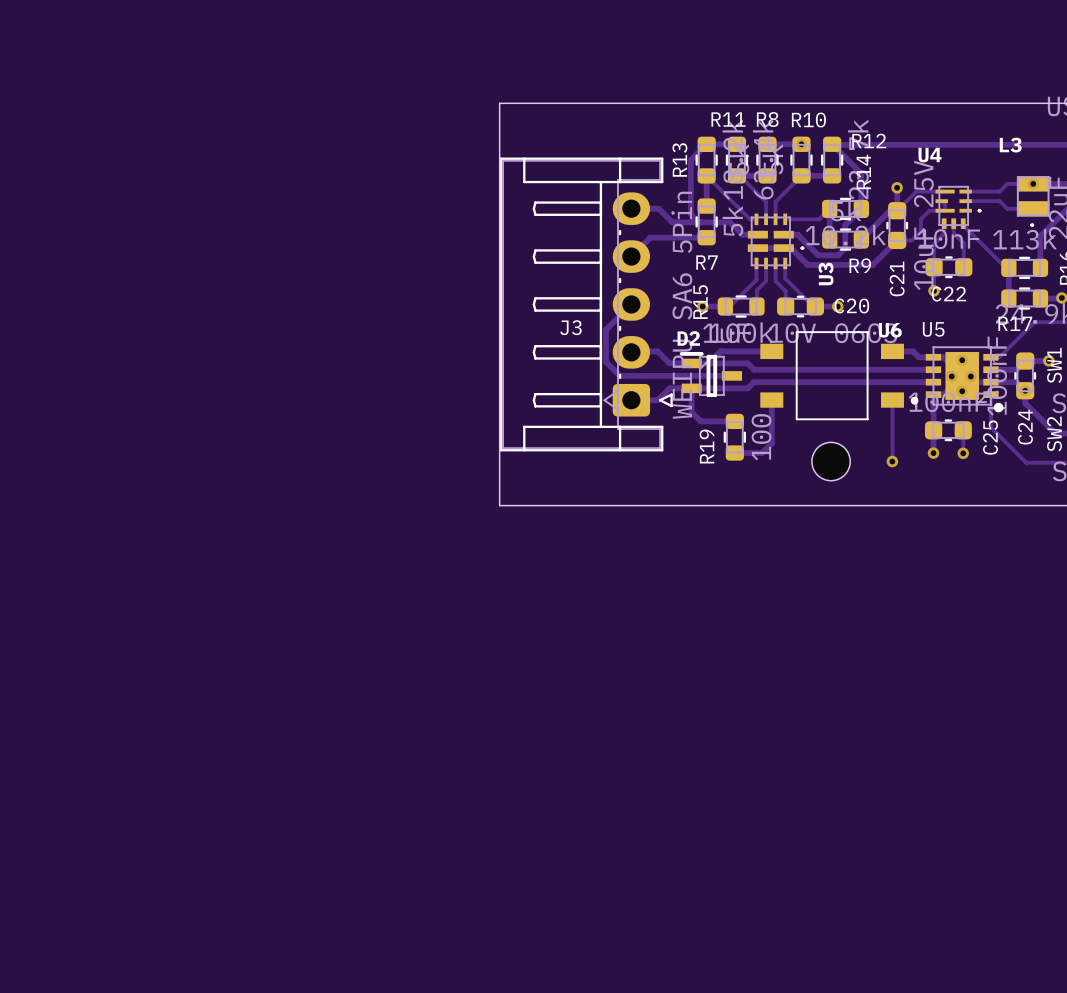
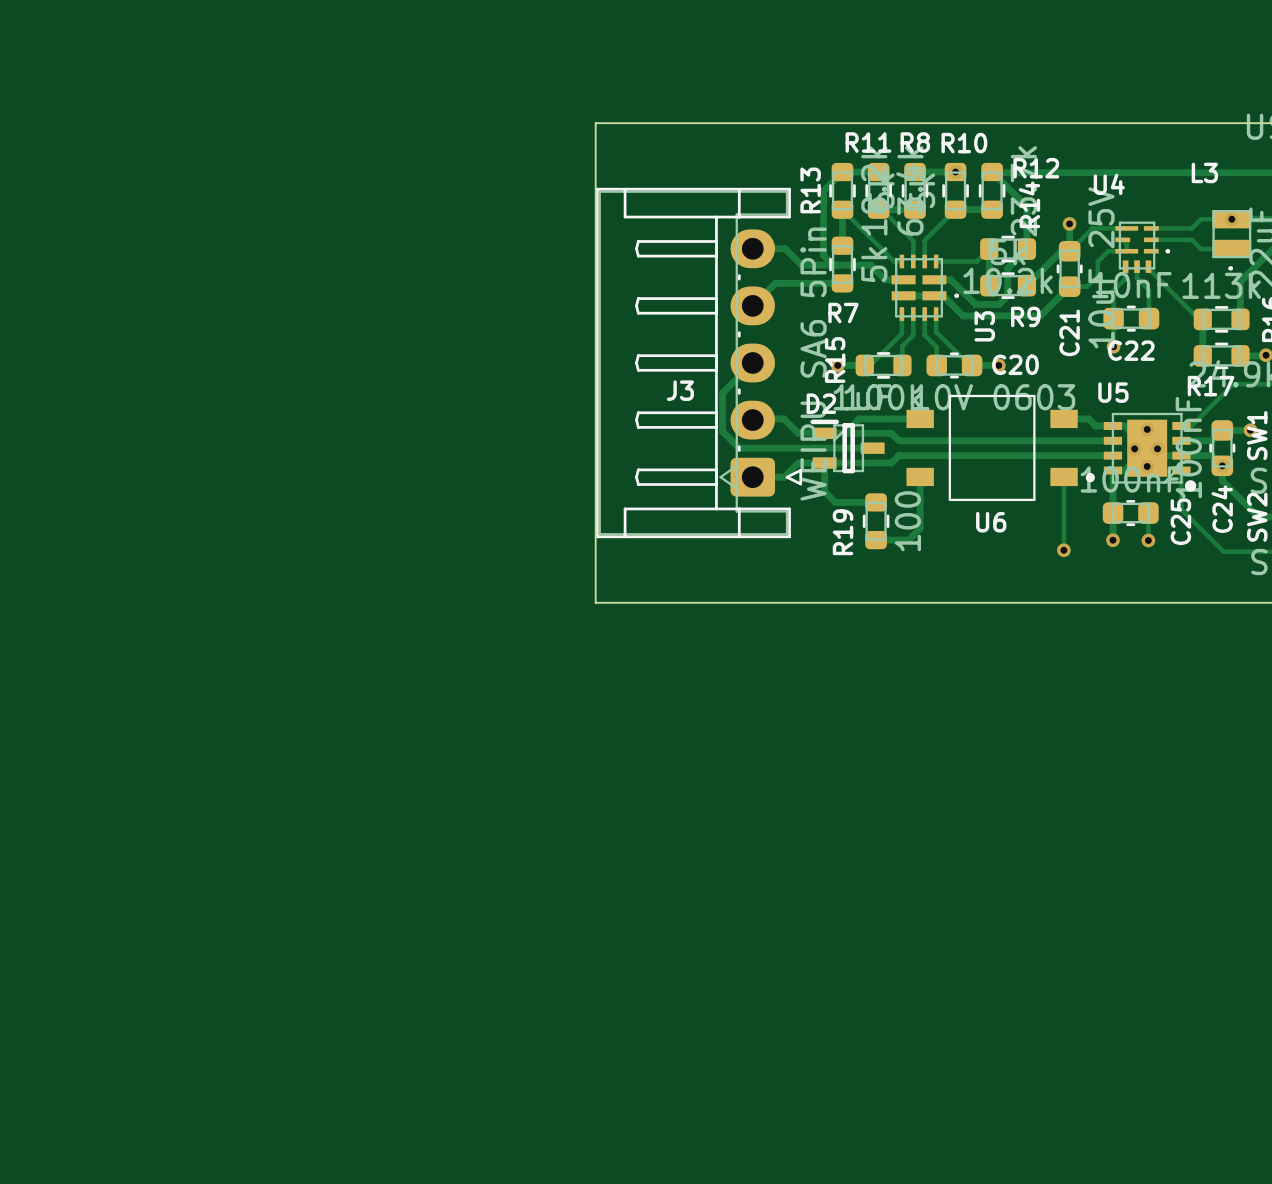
U6 name position: U6 (890, 330) -> U6 (991, 522)
part: (831, 461) -> none

